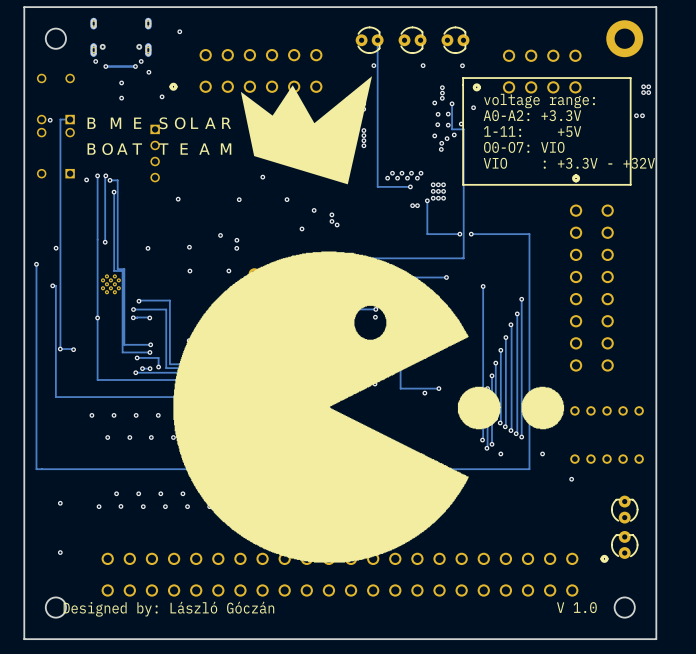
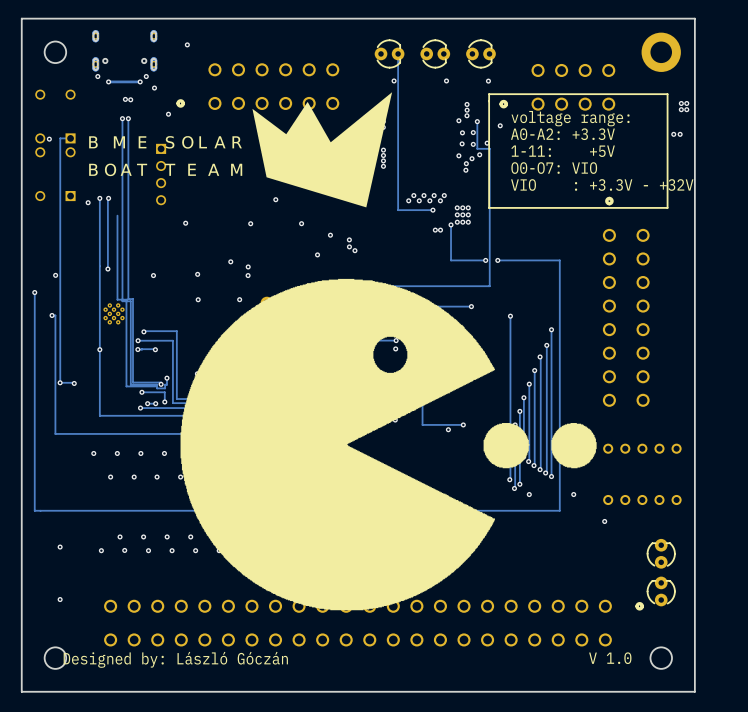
via: none -> (130, 99)
via: (121, 98) -> none
track: none -> (122, 118) (122, 301) (130, 301) (130, 384) (157, 384) (157, 388) (165, 388) (166, 378)
via: none -> (122, 118)
track: none -> (128, 118) (128, 299) (132, 299) (132, 382) (161, 382) (161, 384)
via: none -> (128, 118)
track: (109, 180) (117, 180) (117, 269) (124, 269) (124, 344) (150, 344) -> none
via: (109, 180) -> none
via: (114, 192) -> none
via: (150, 344) -> none
via: none -> (166, 378)
via: none -> (161, 384)
via: (149, 352) -> none

